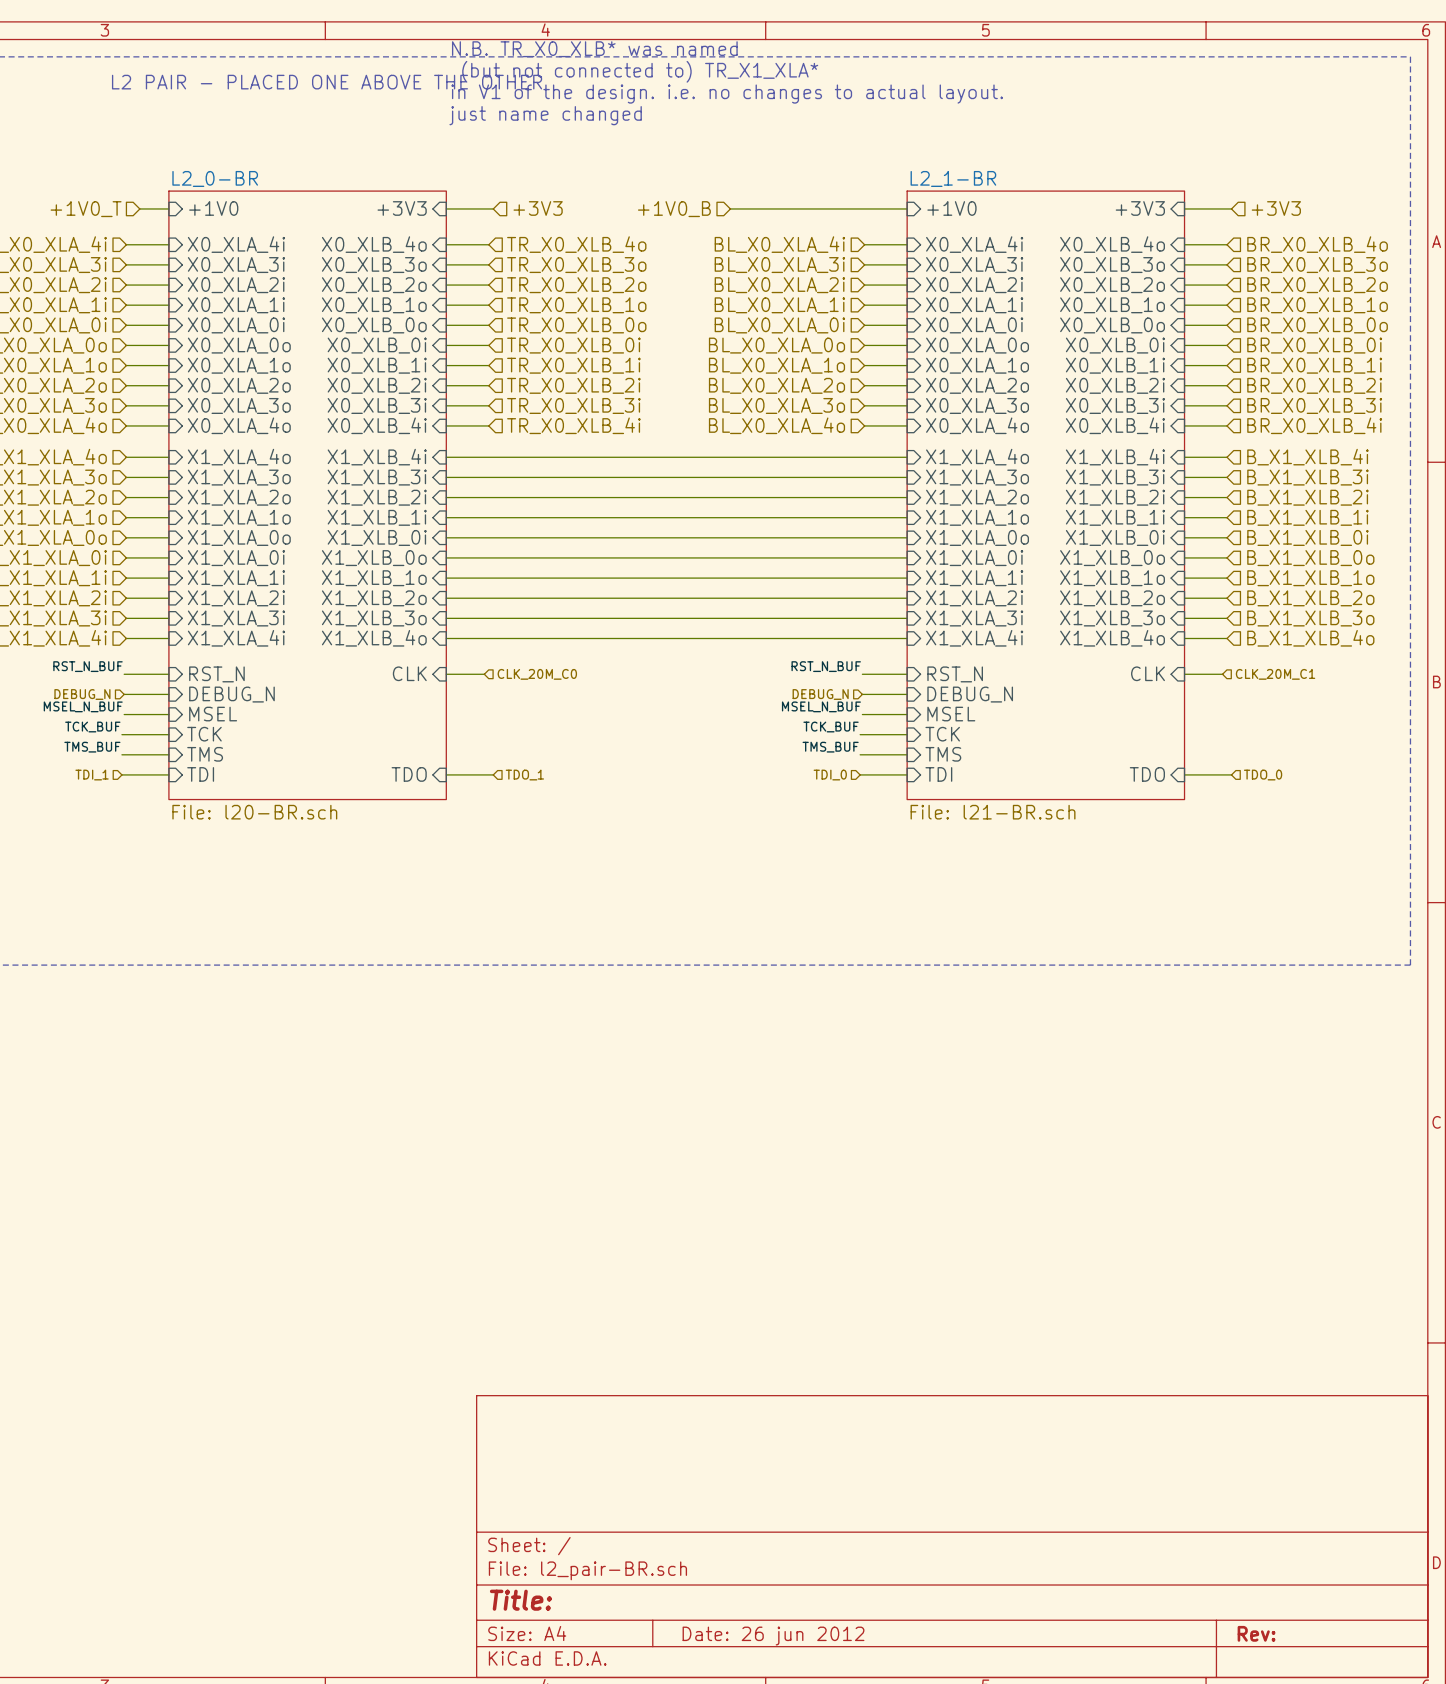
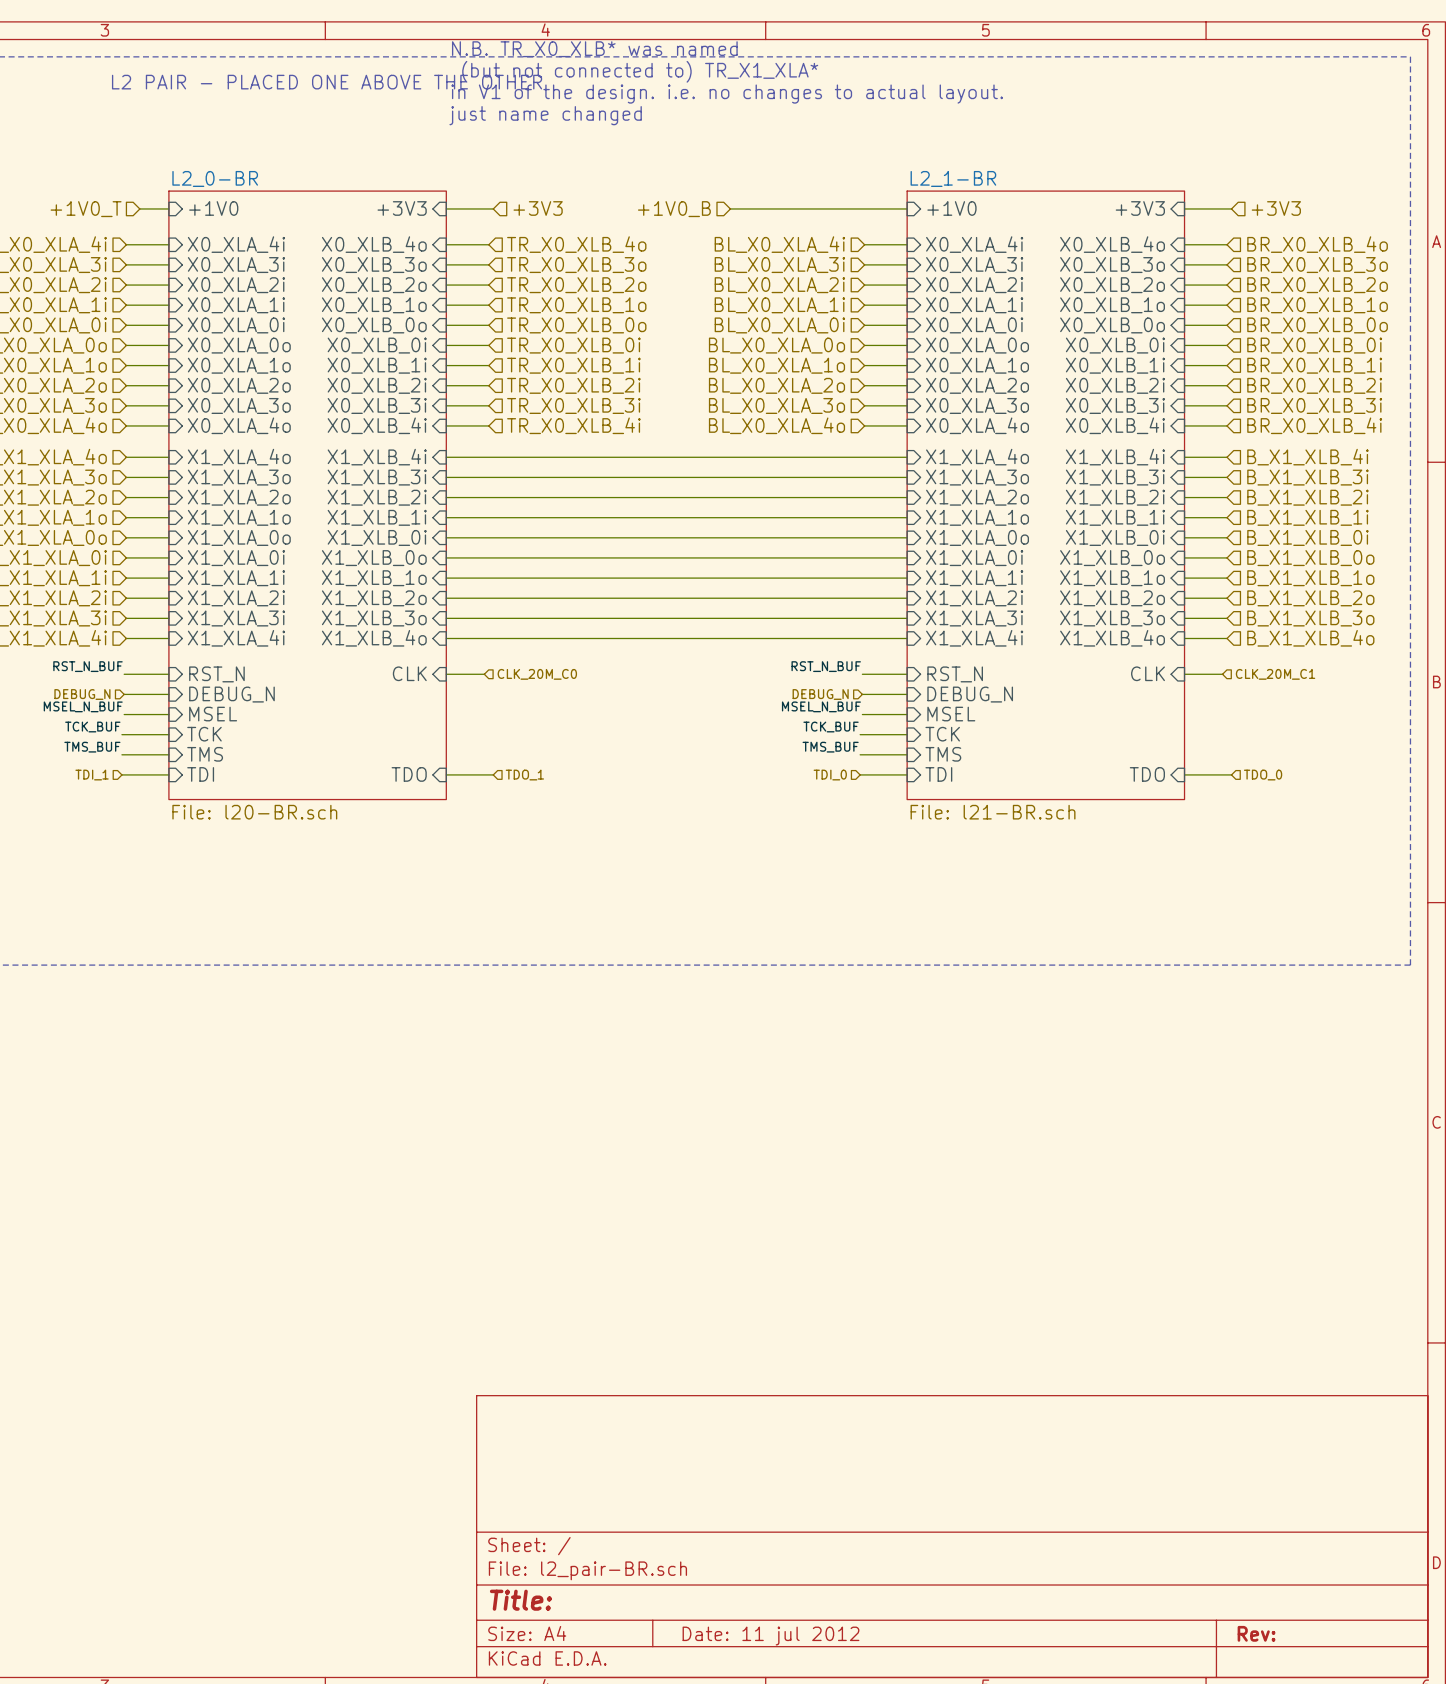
title block: Date: 26 jun 2012 (773, 1636) -> Date: 11 jul 2012 (770, 1636)

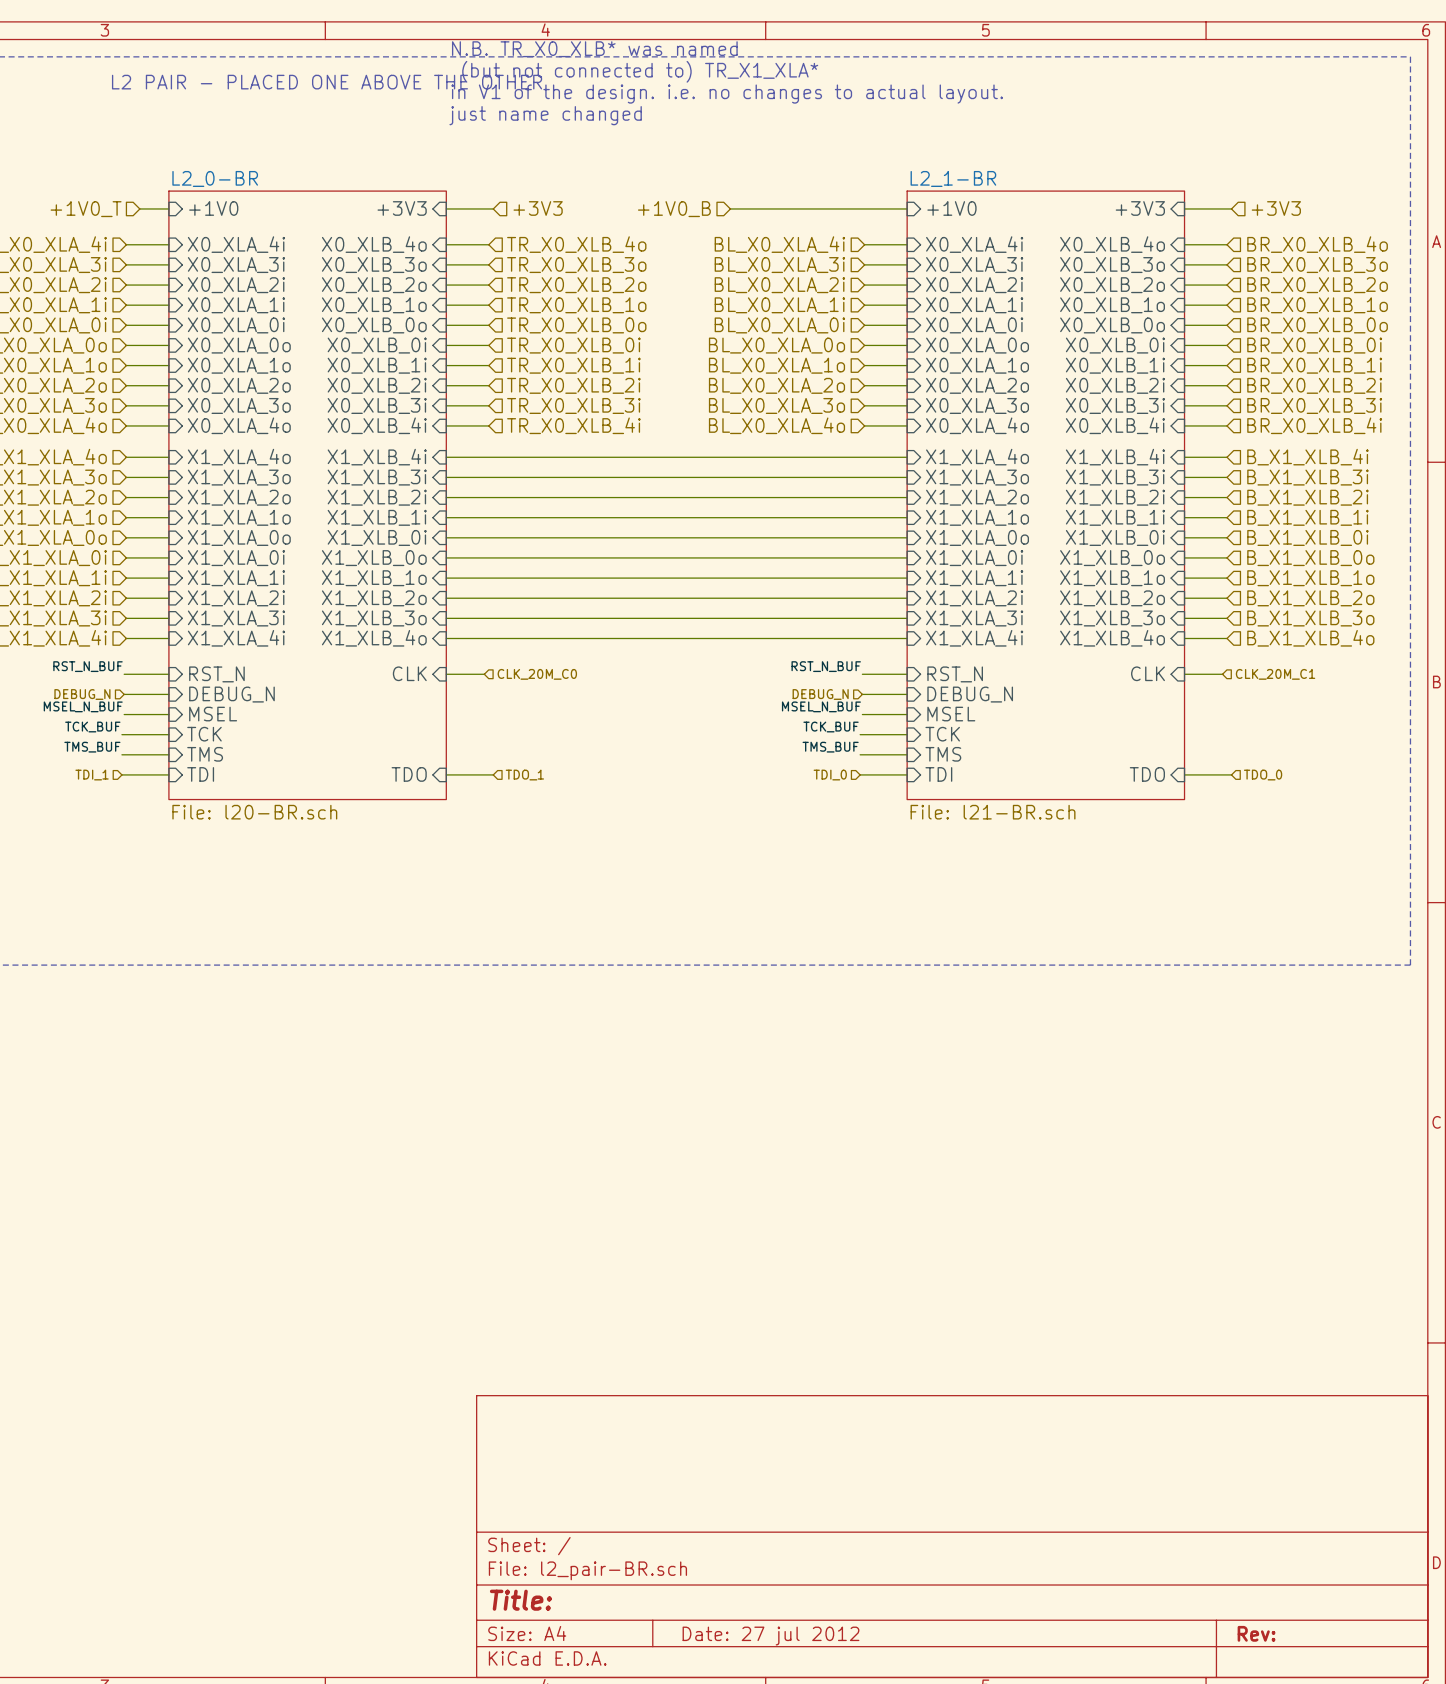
title block: Date: 11 jul 2012 (770, 1636) -> Date: 27 jul 2012 (770, 1636)

